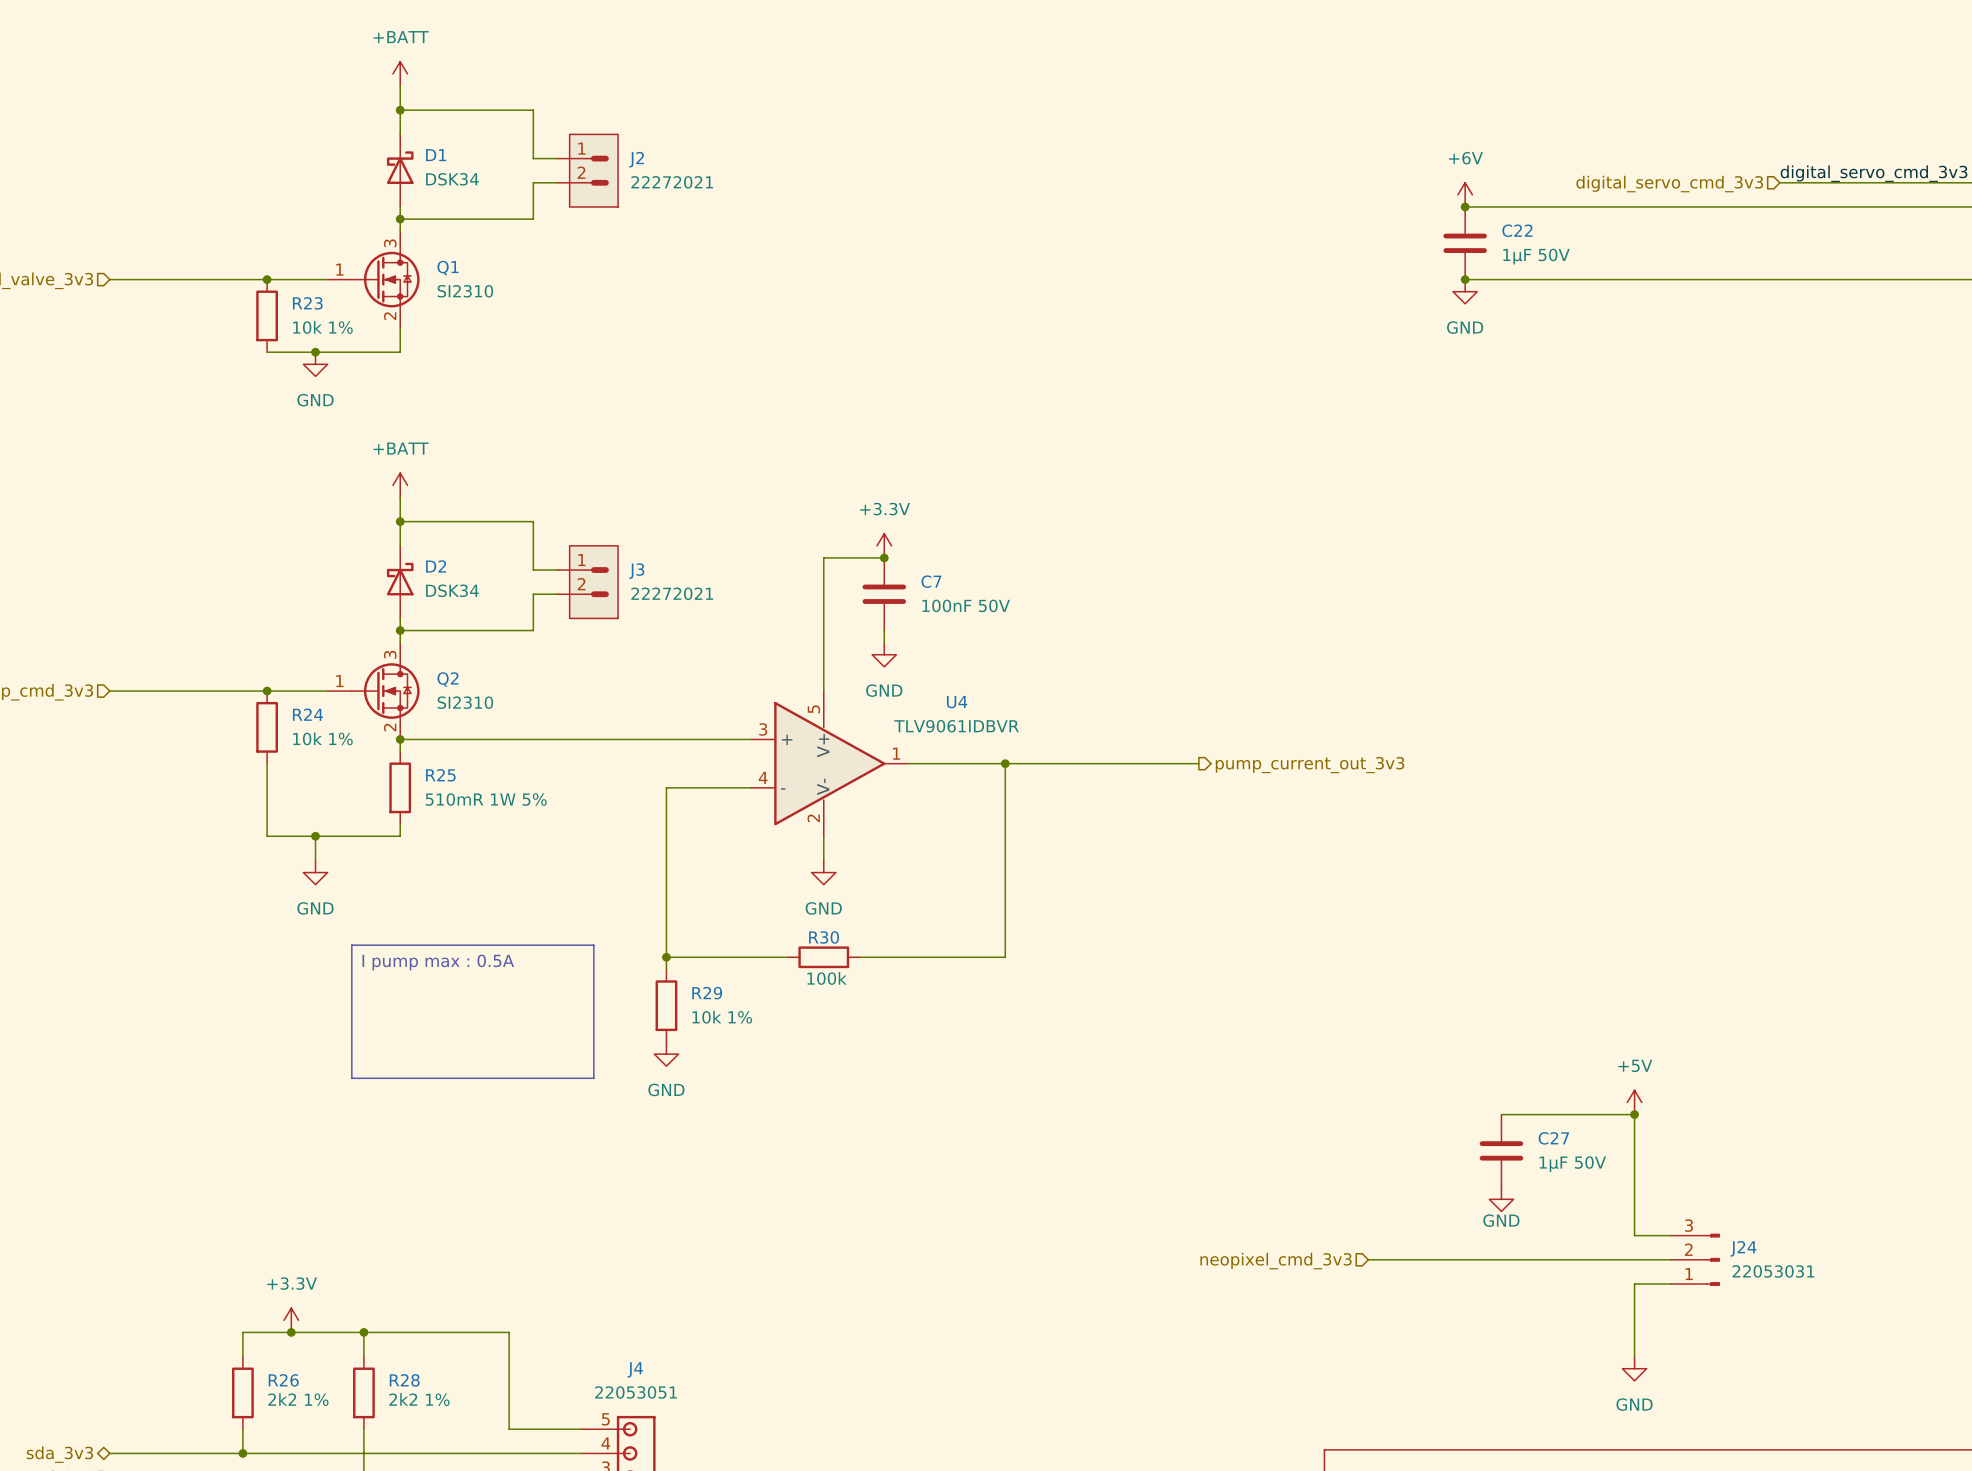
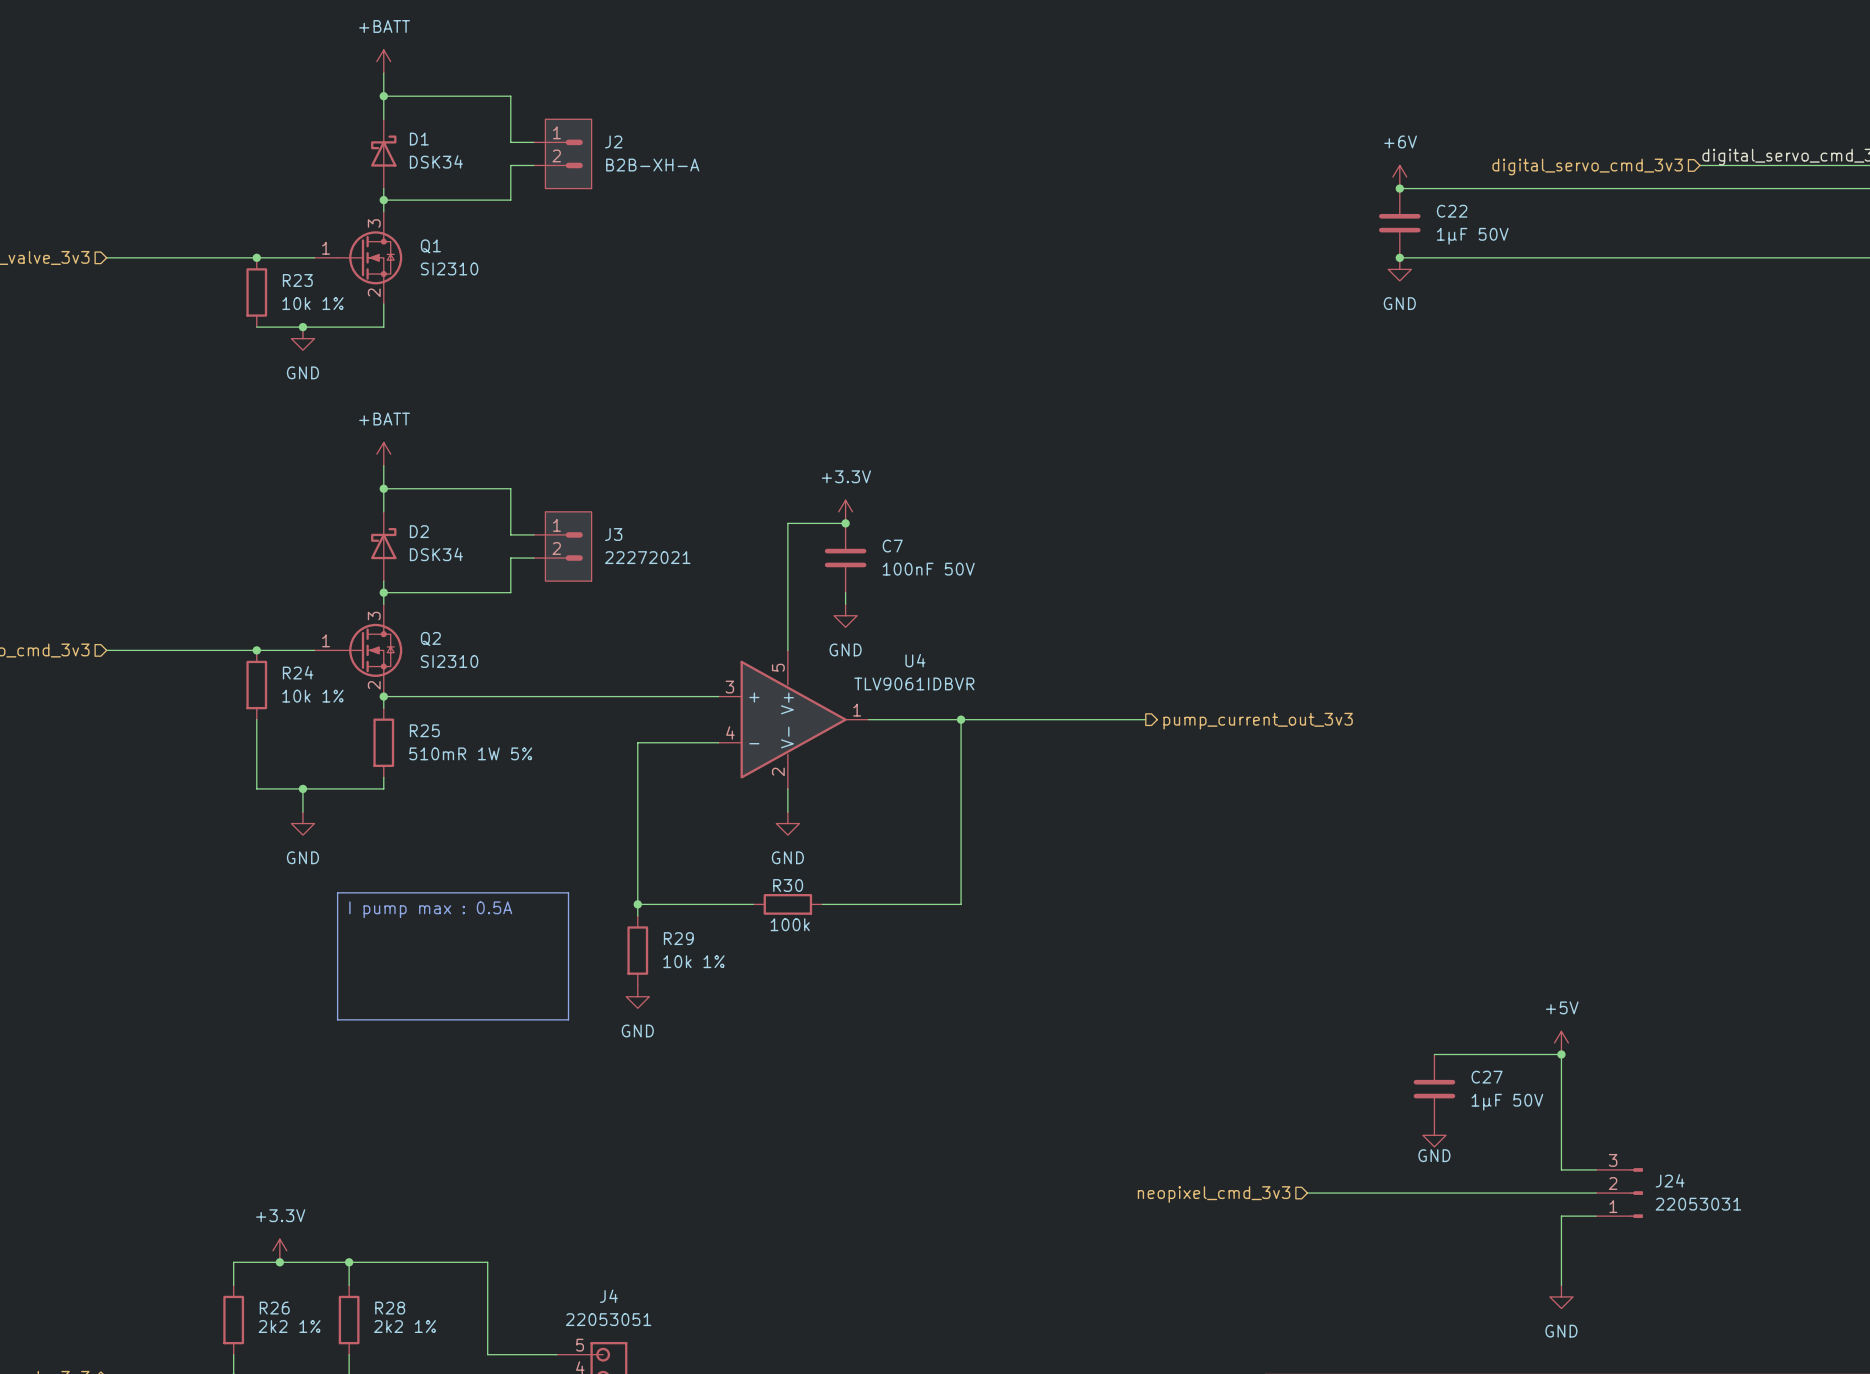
J2 value: 22272021 (672, 182) -> B2B-XH-A (652, 165)

